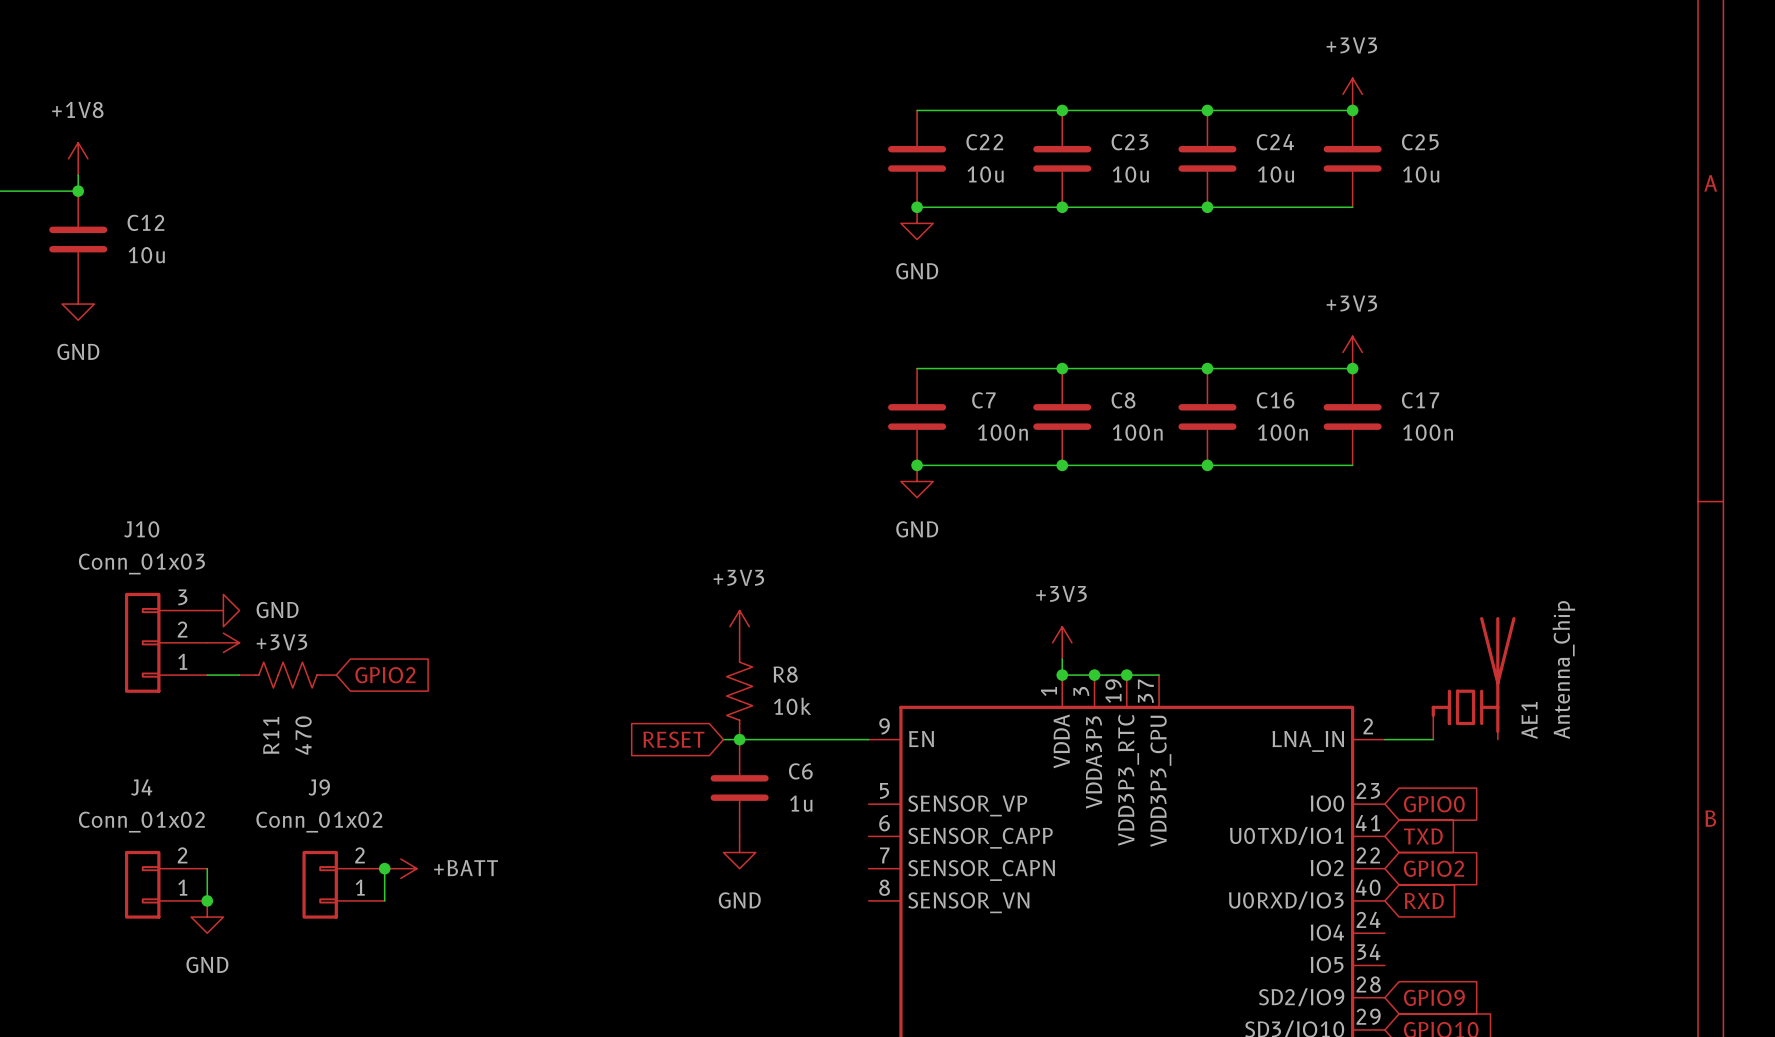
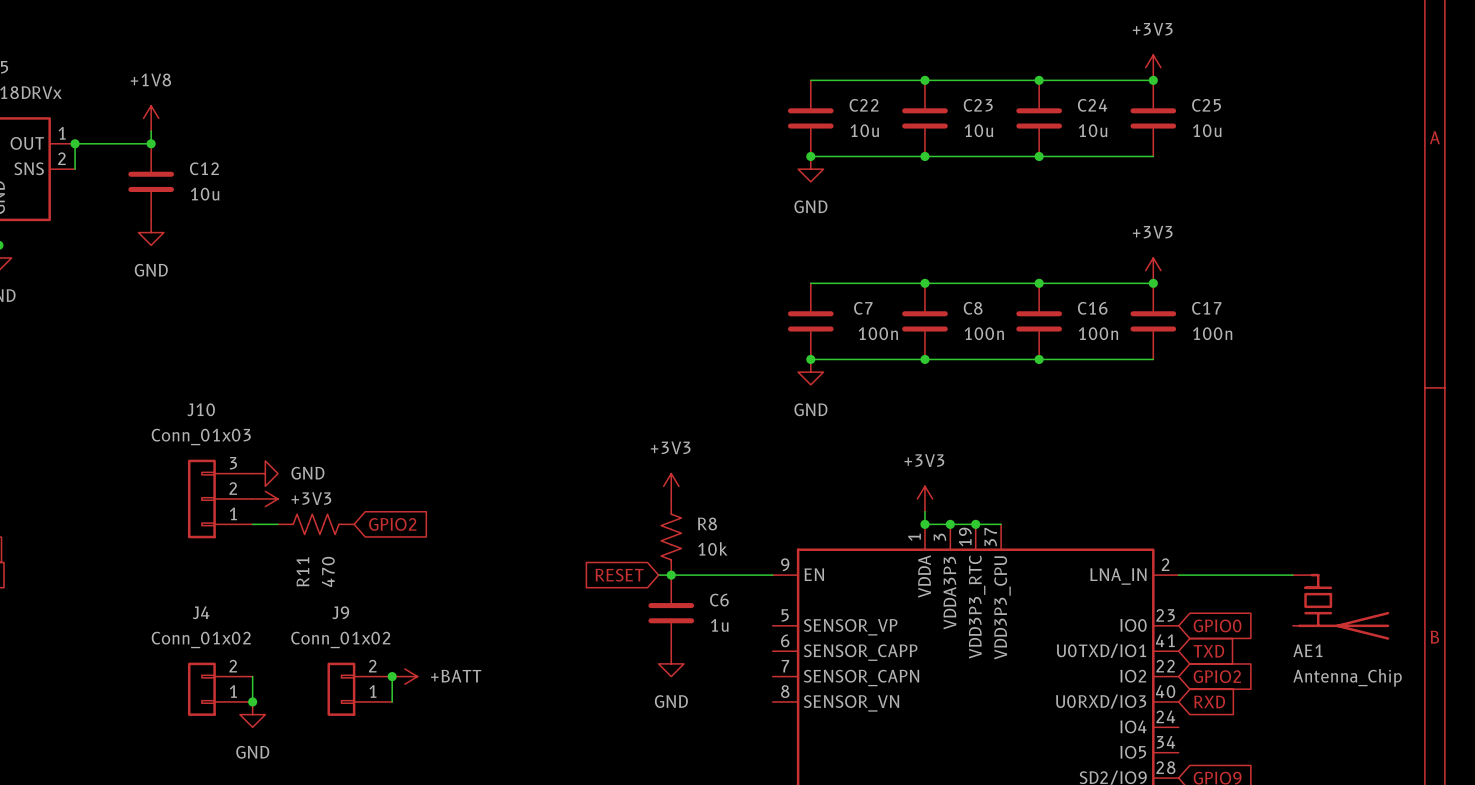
AE1 rotation: 0° (1473, 675) -> 90° clockwise (1343, 606)
AE1 position: (1473, 678) -> (1341, 606)
wire: none -> (1216, 575) (1292, 575)

